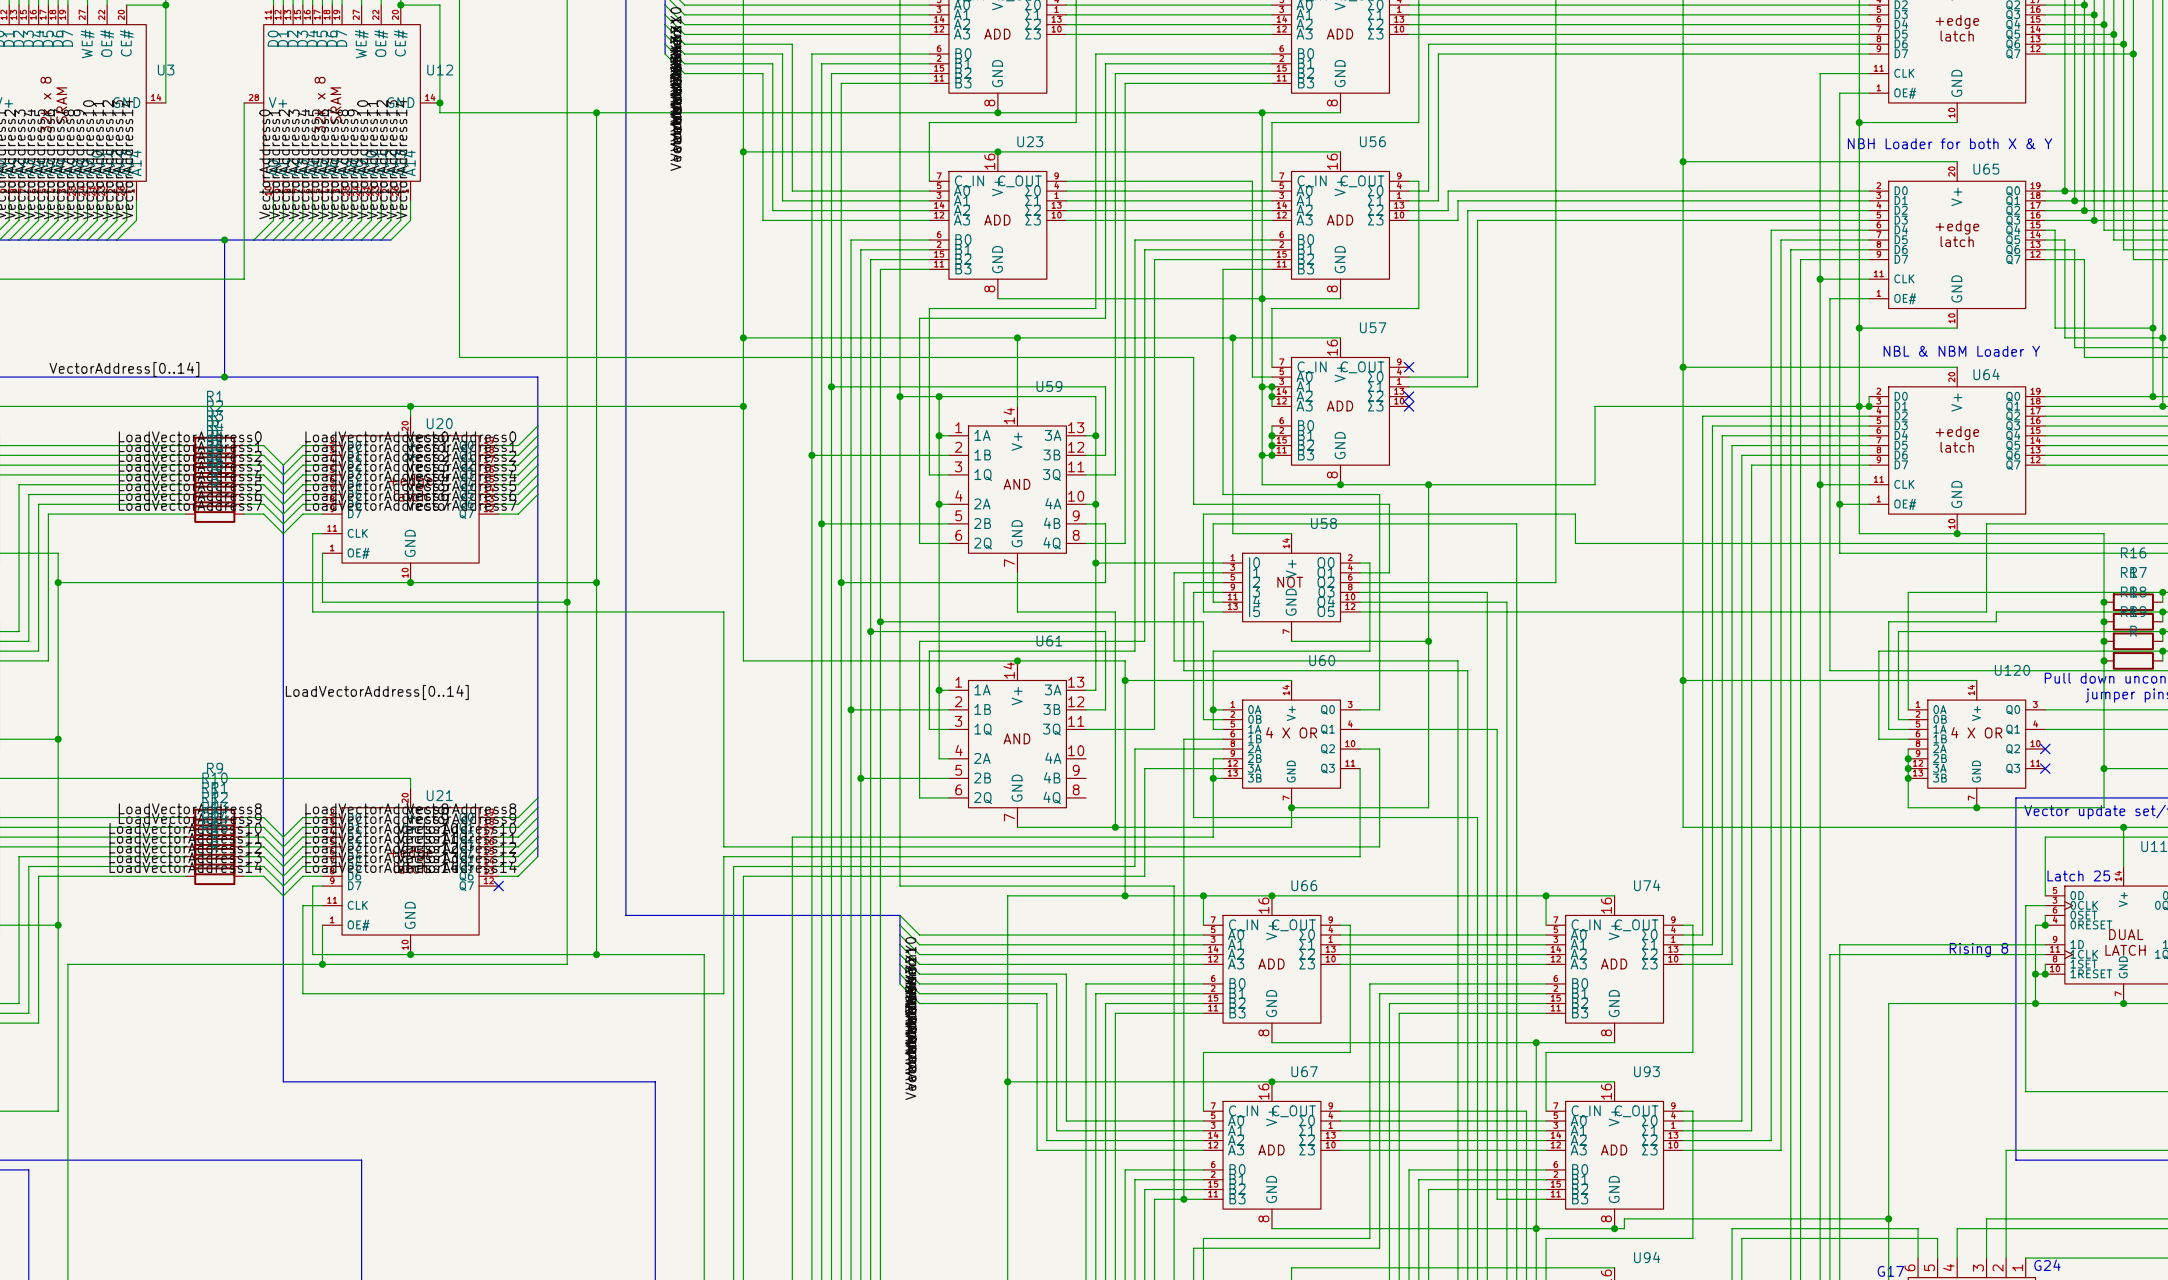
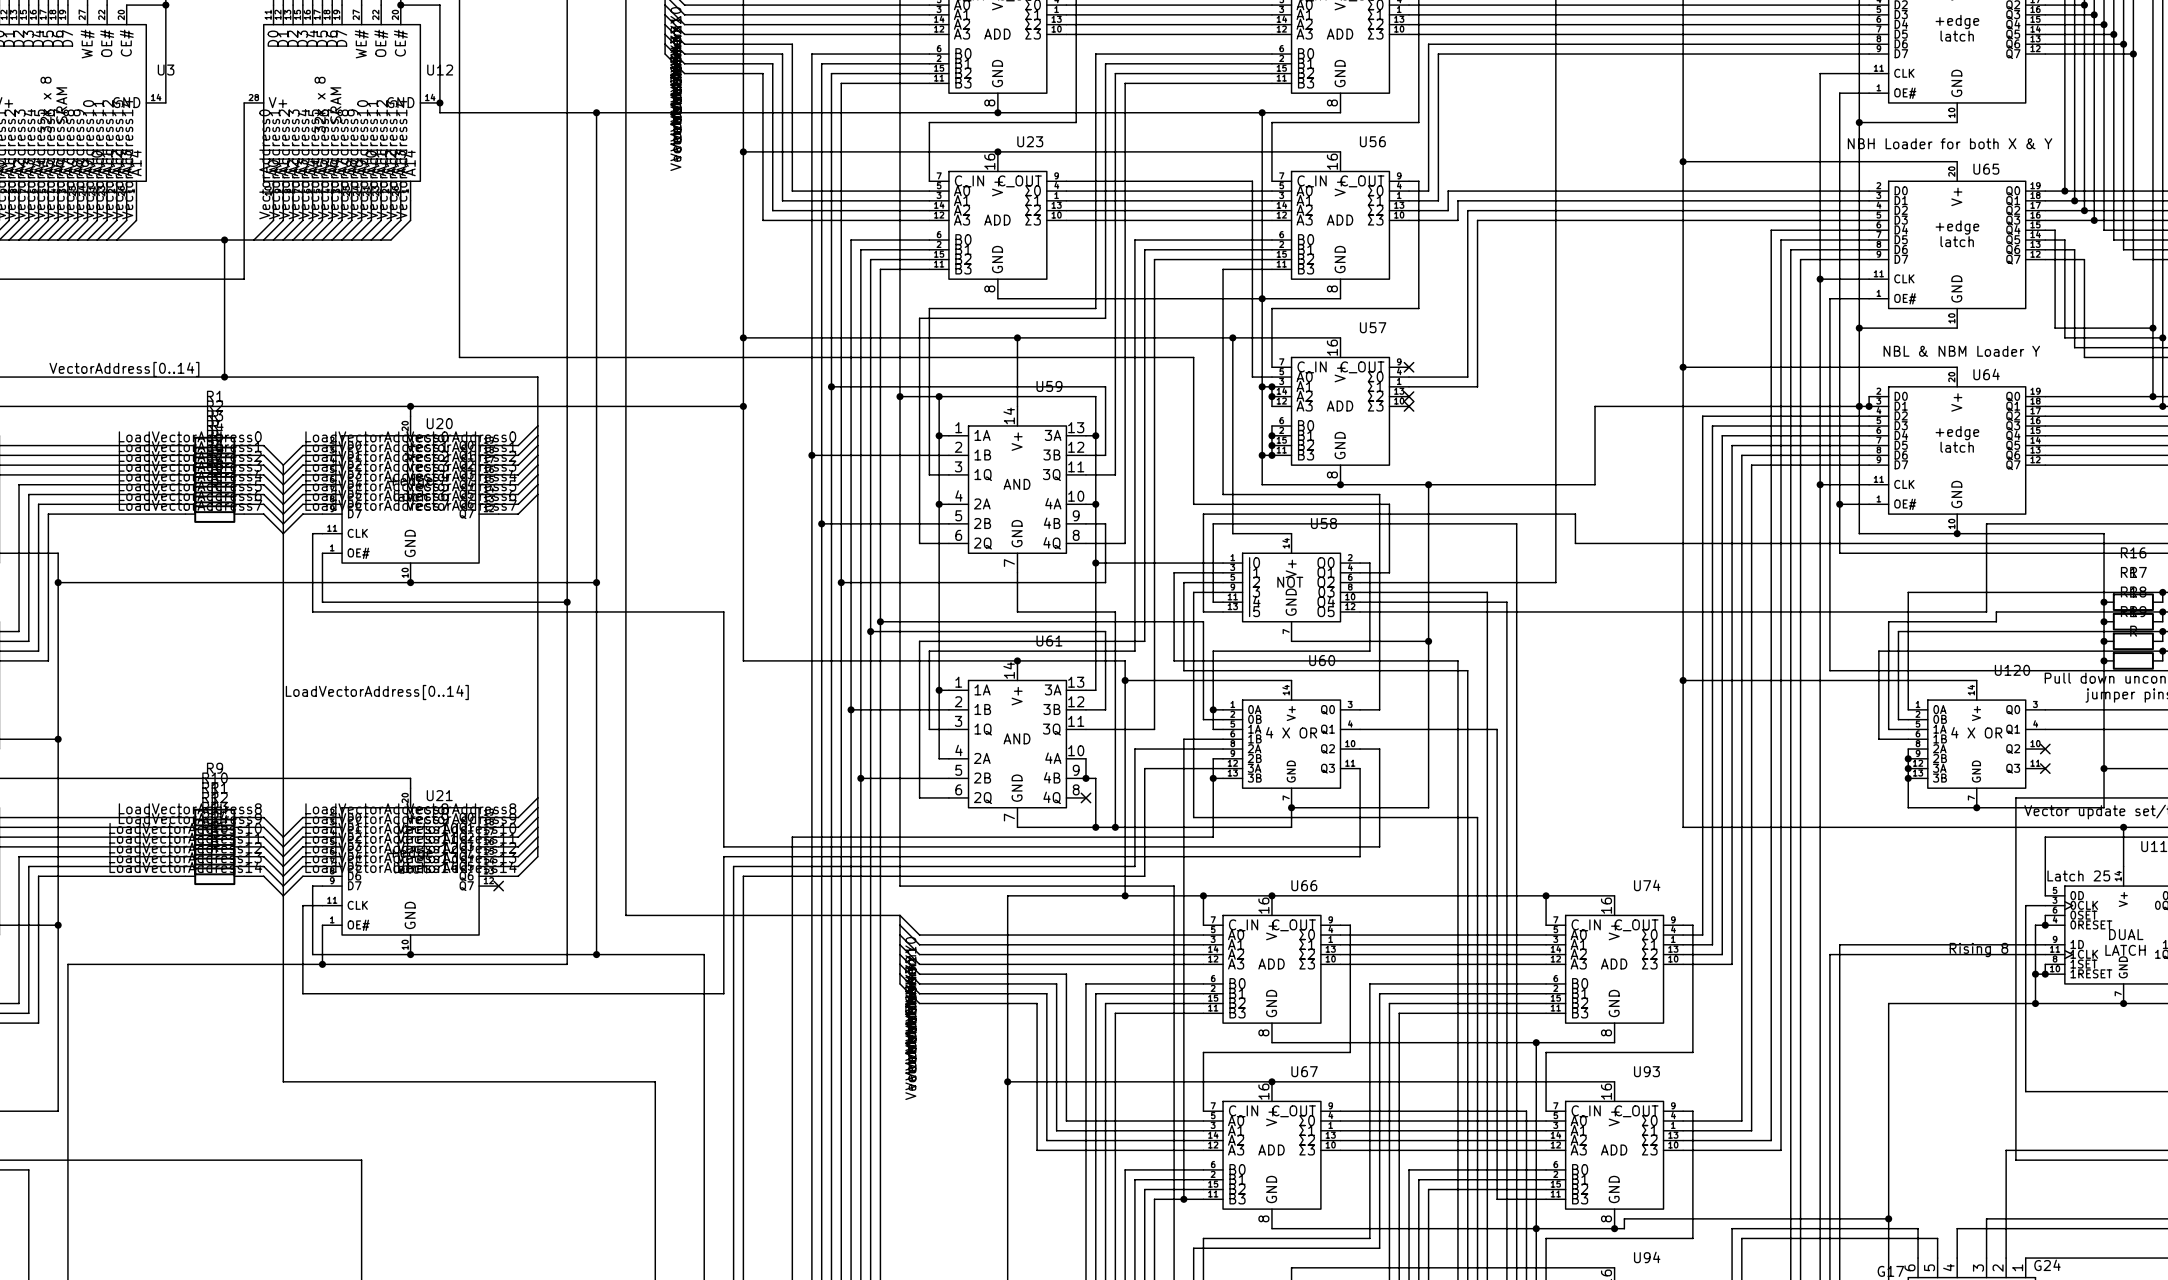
wire: none -> (1085, 758) (1085, 778) (1095, 778) (1095, 827)
junction: none -> (1085, 778)
no-connect mark: none -> (1085, 797)
junction: none -> (1095, 827)

